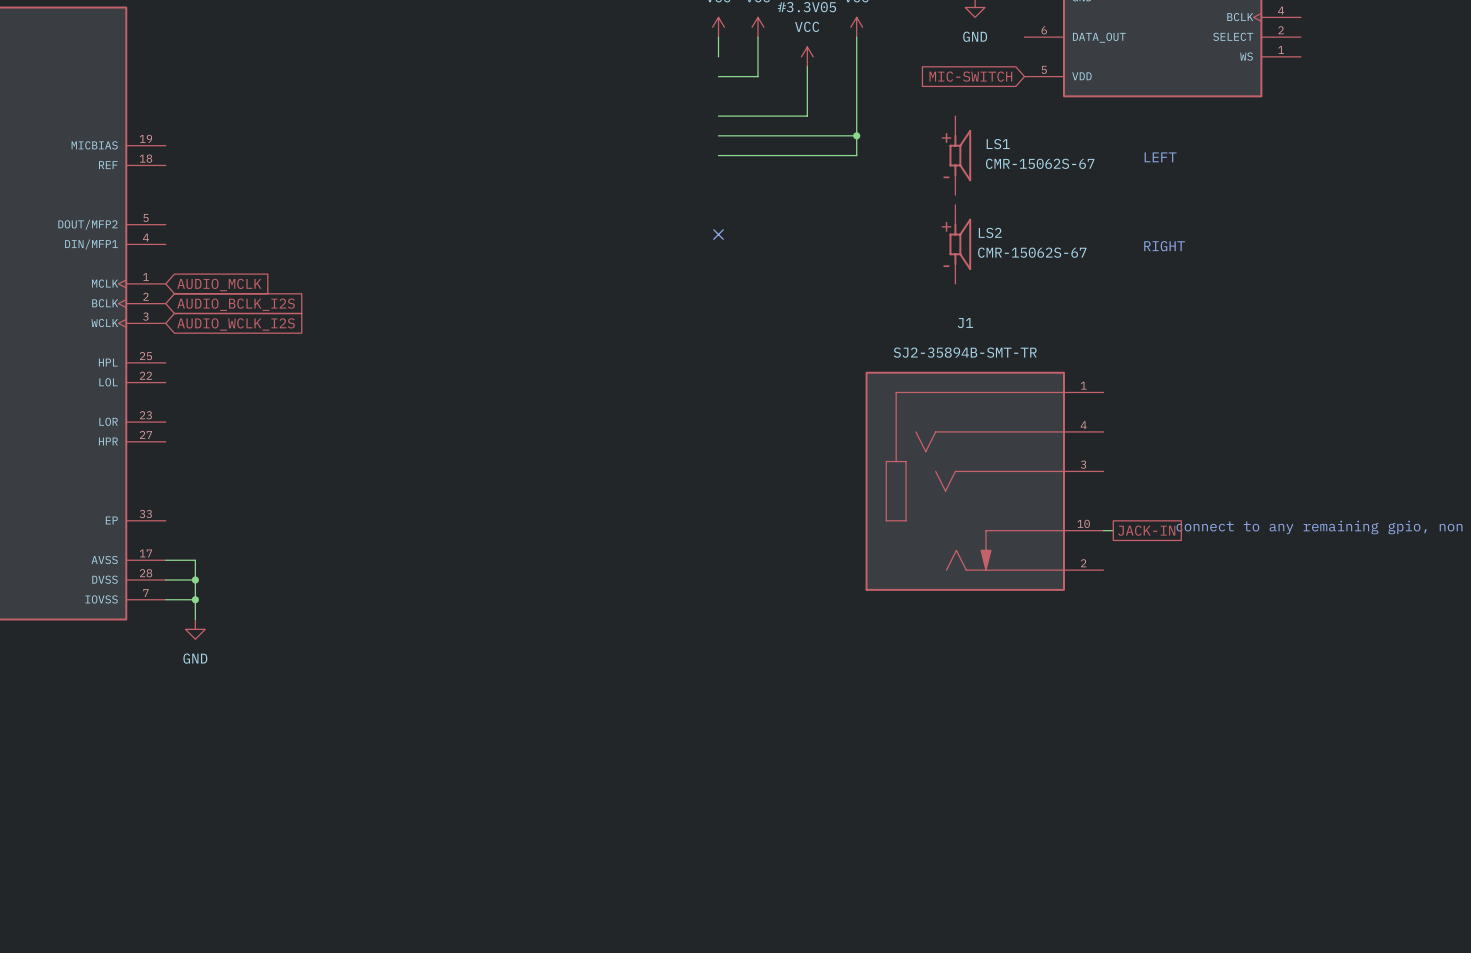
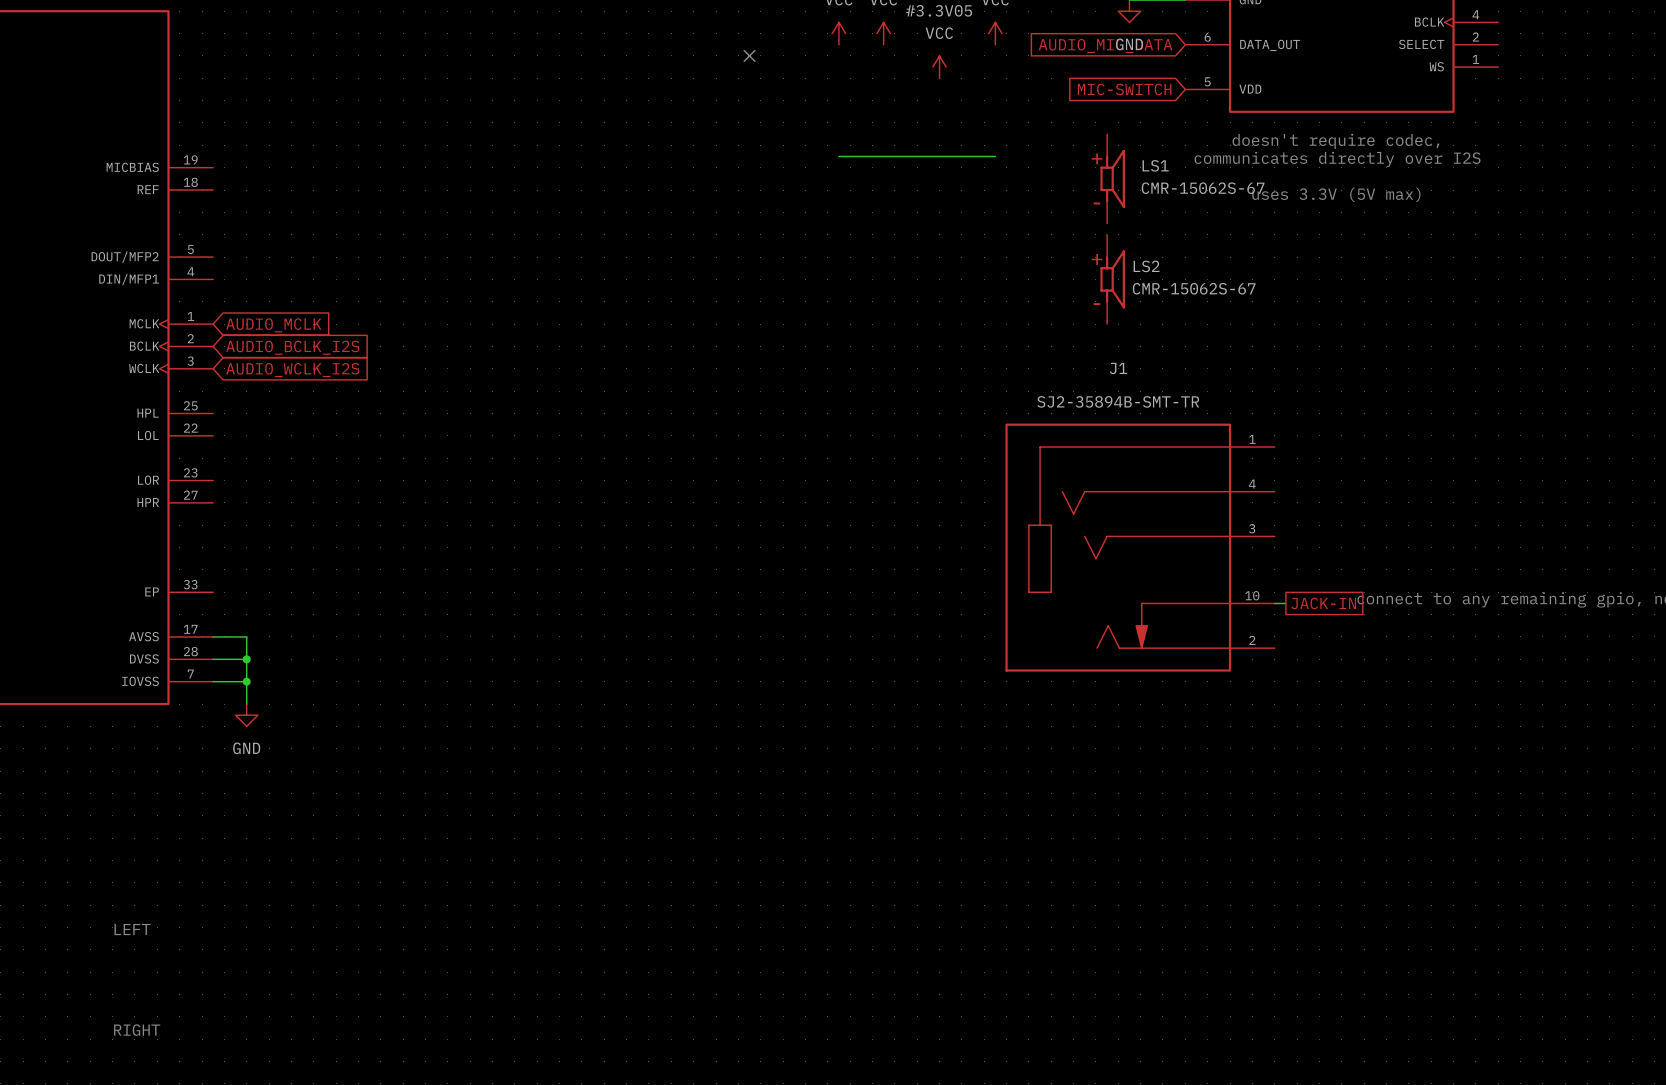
wire: (718, 37) (718, 56) -> none
wire: (757, 37) (757, 76) (718, 76) -> none
wire: (856, 37) (856, 155) (718, 155) -> none
global label: none -> AUDIO_MIC_DATA (1105, 46)
no-connect mark: none -> (749, 55)
wire: (807, 66) (807, 116) (718, 116) -> none
text: none -> doesn't require codec, (1336, 141)
junction: (856, 135) -> none
text: none -> communicates directly over I2S (1337, 159)
text: LEFT (1160, 157) -> none
text: none -> uses 3.3V (5V max) (1336, 194)
no-connect mark: (718, 234) -> none
text: RIGHT (1164, 246) -> none
text: none -> LEFT (132, 929)
text: none -> RIGHT (137, 1030)

